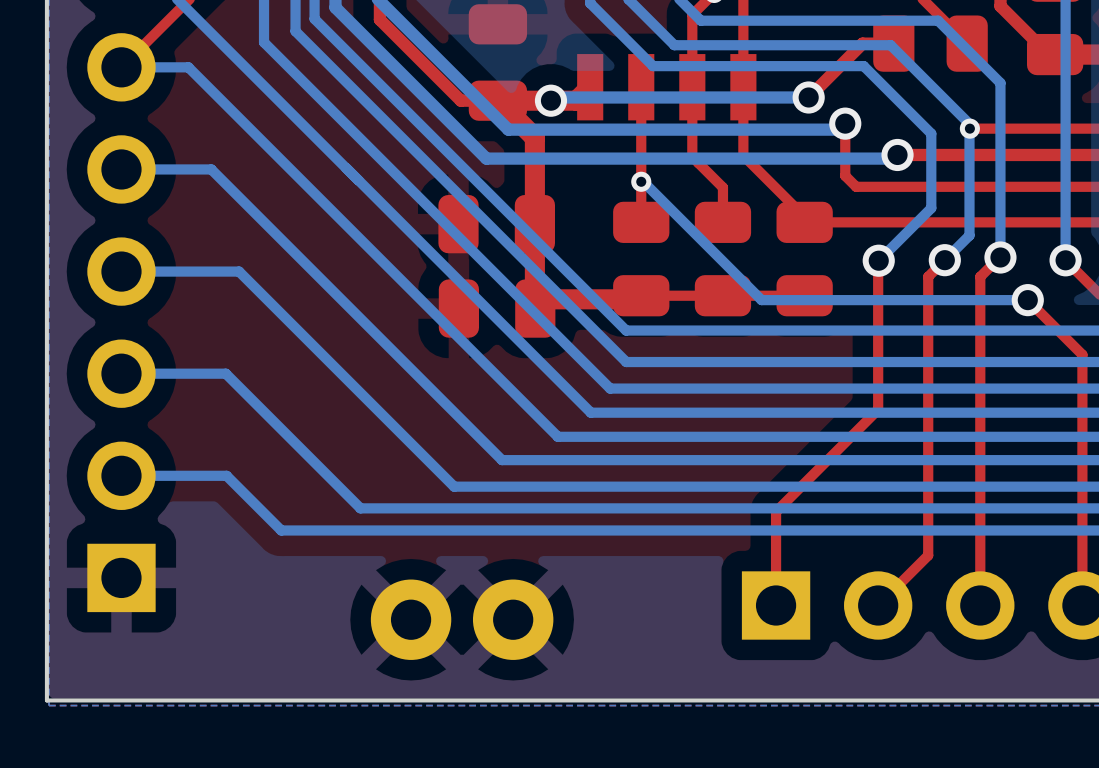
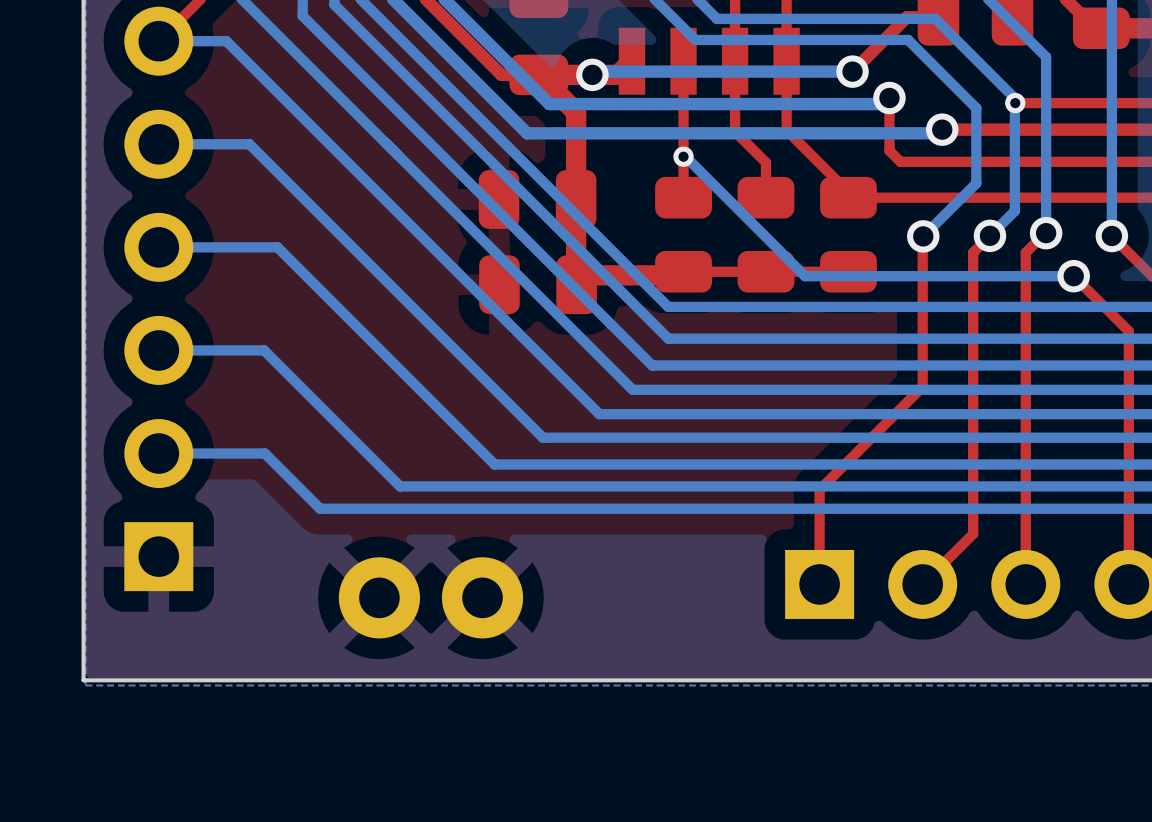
part position: (462, 619) -> (430, 597)

